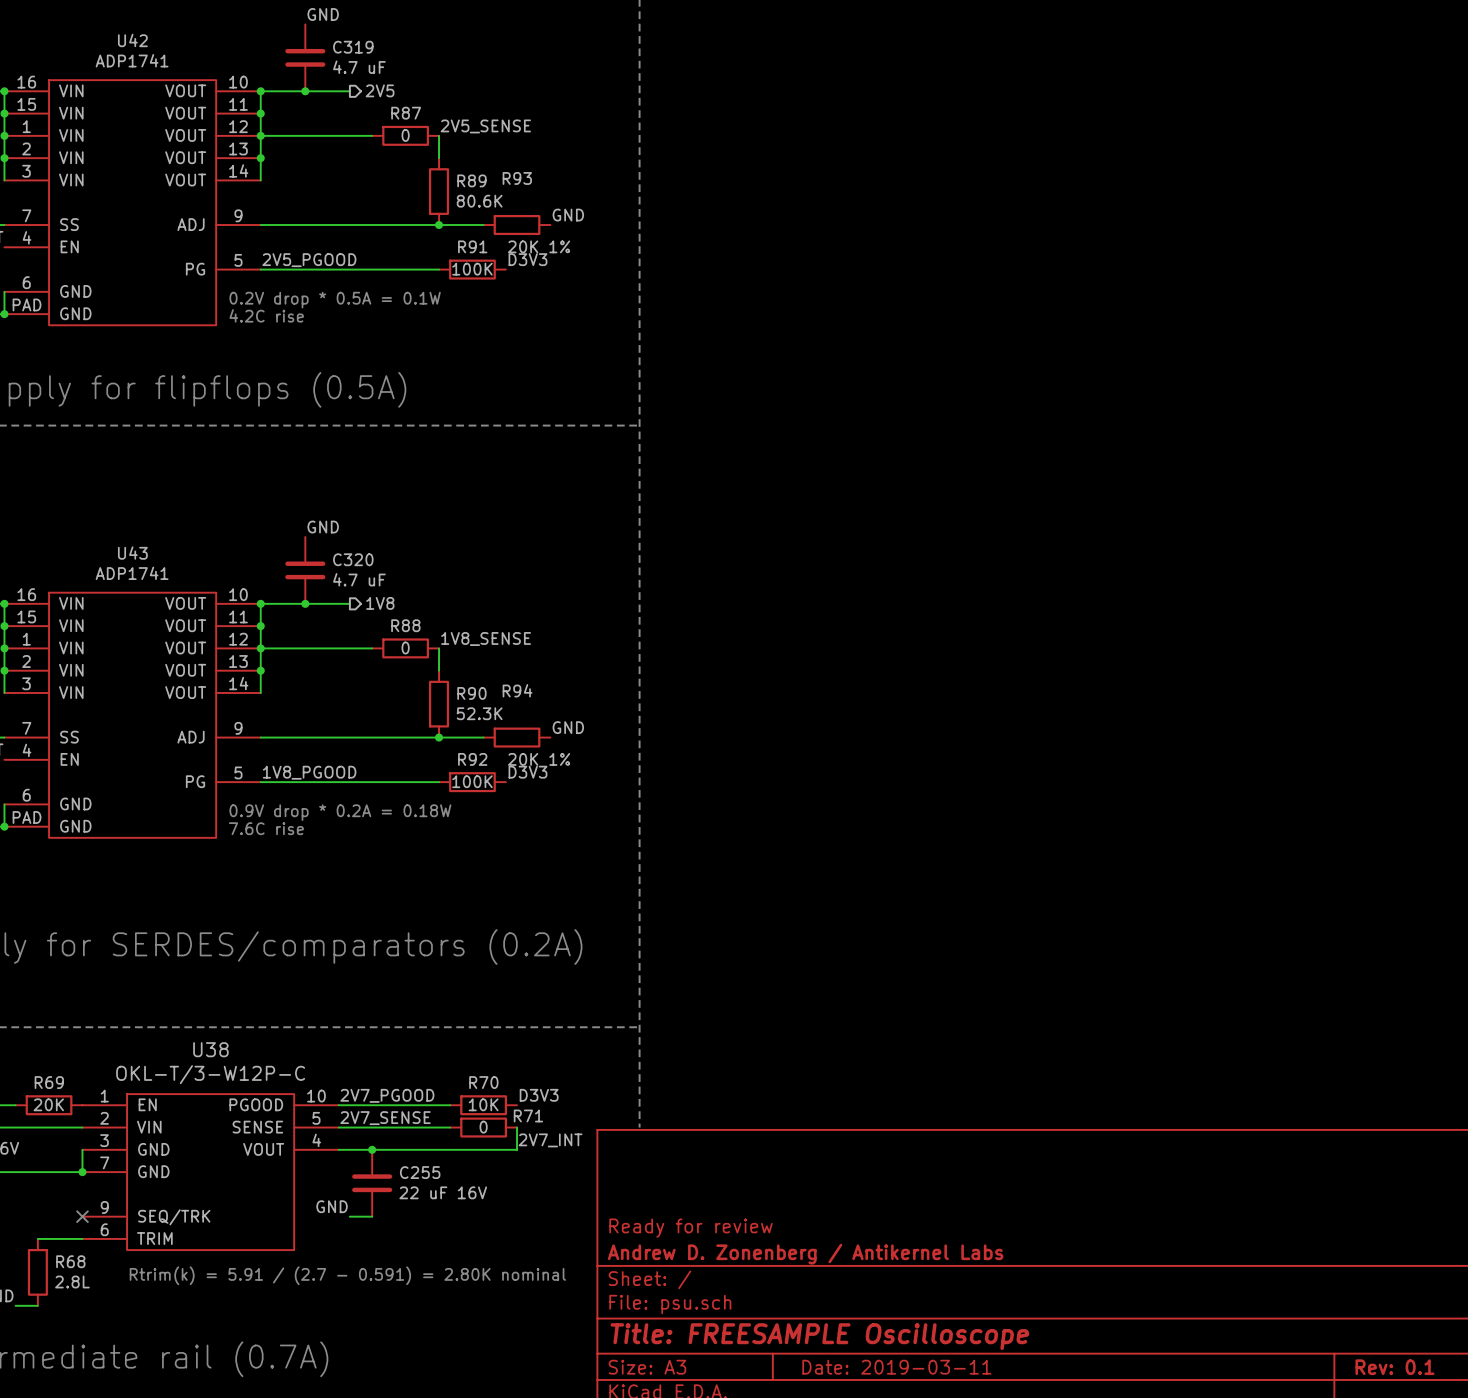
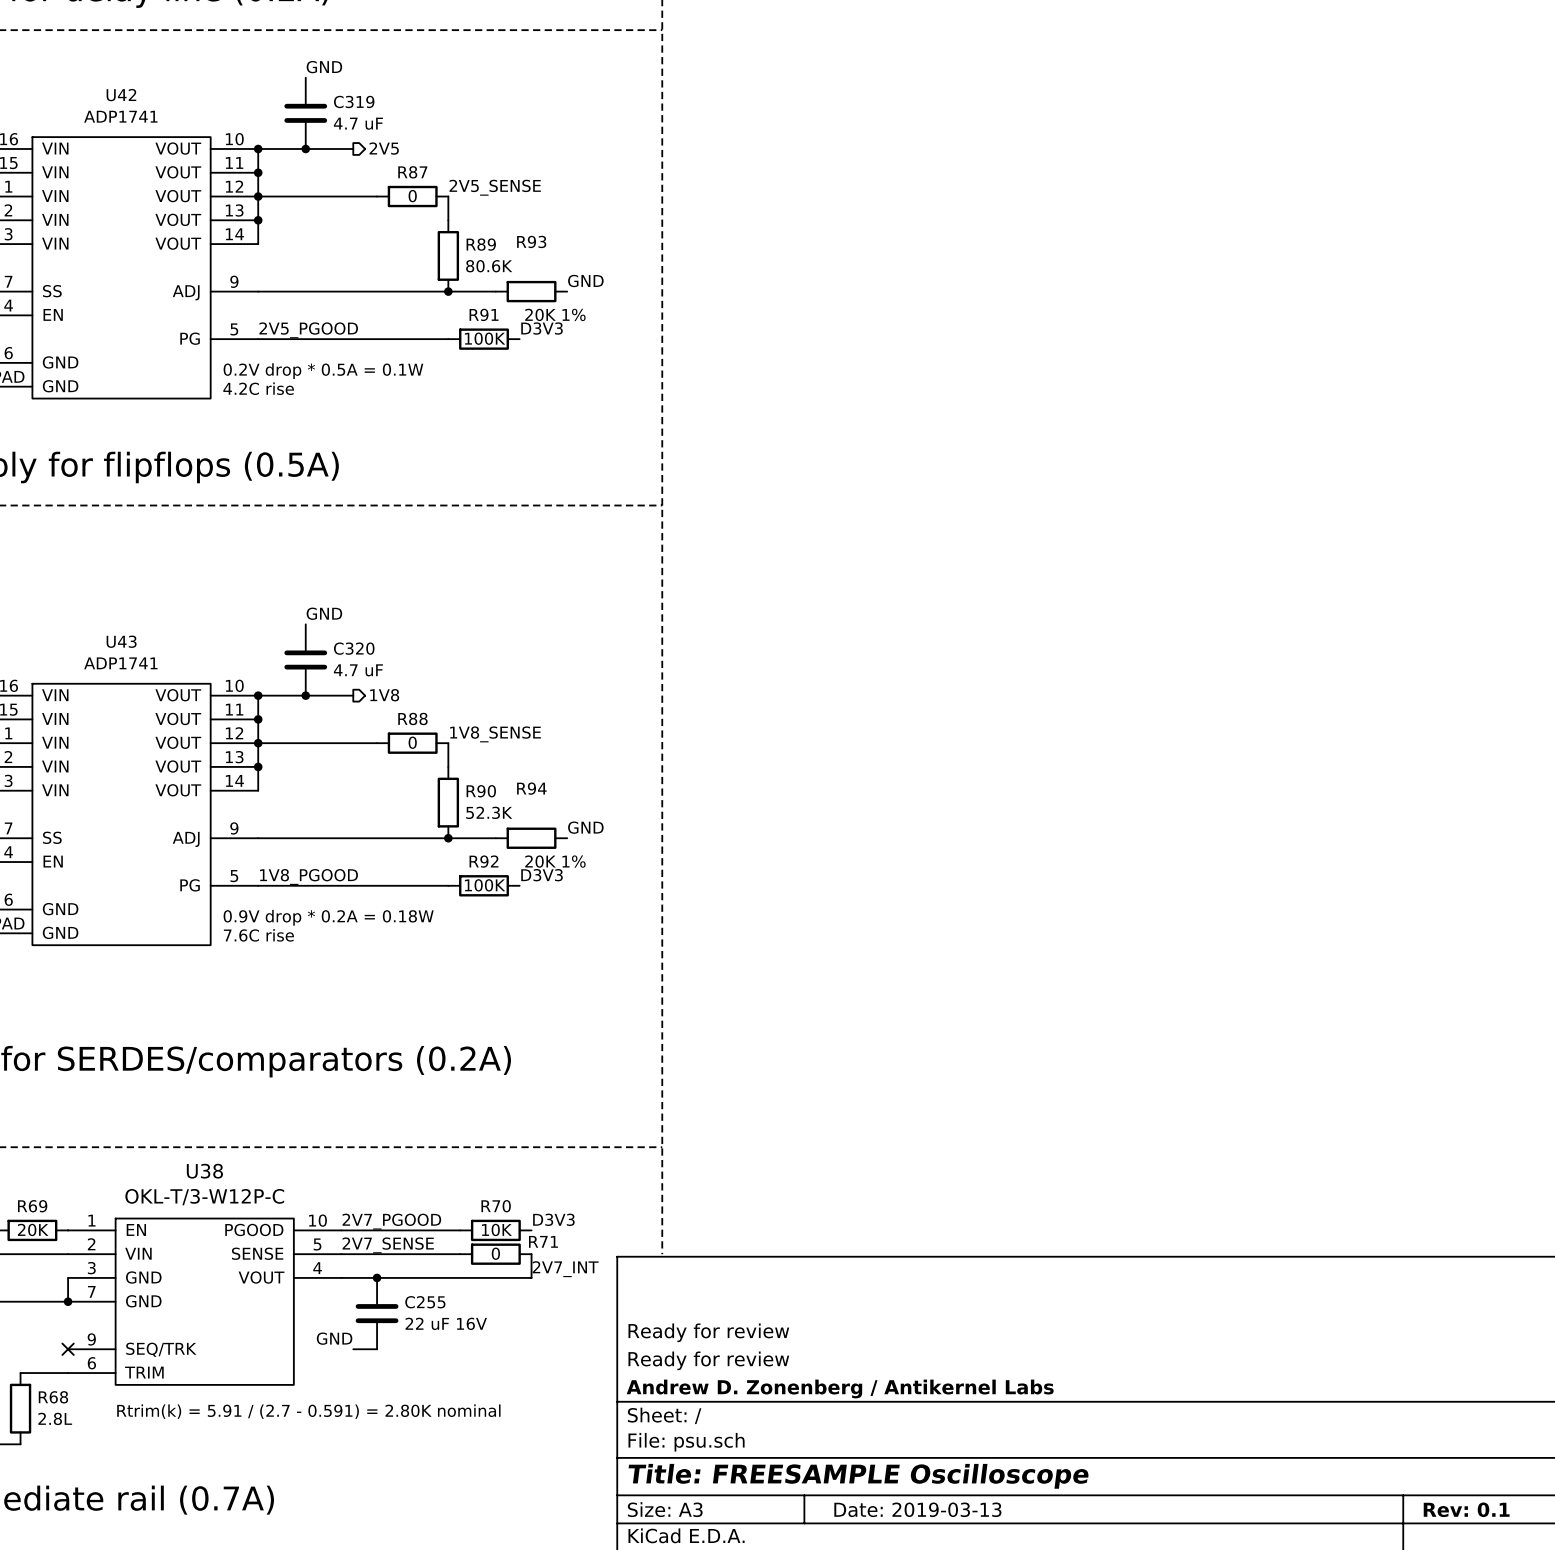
title block: none -> Ready for review (708, 1332)
title block: Date: 2019-03-11 (896, 1367) -> Date: 2019-03-13 (917, 1509)

